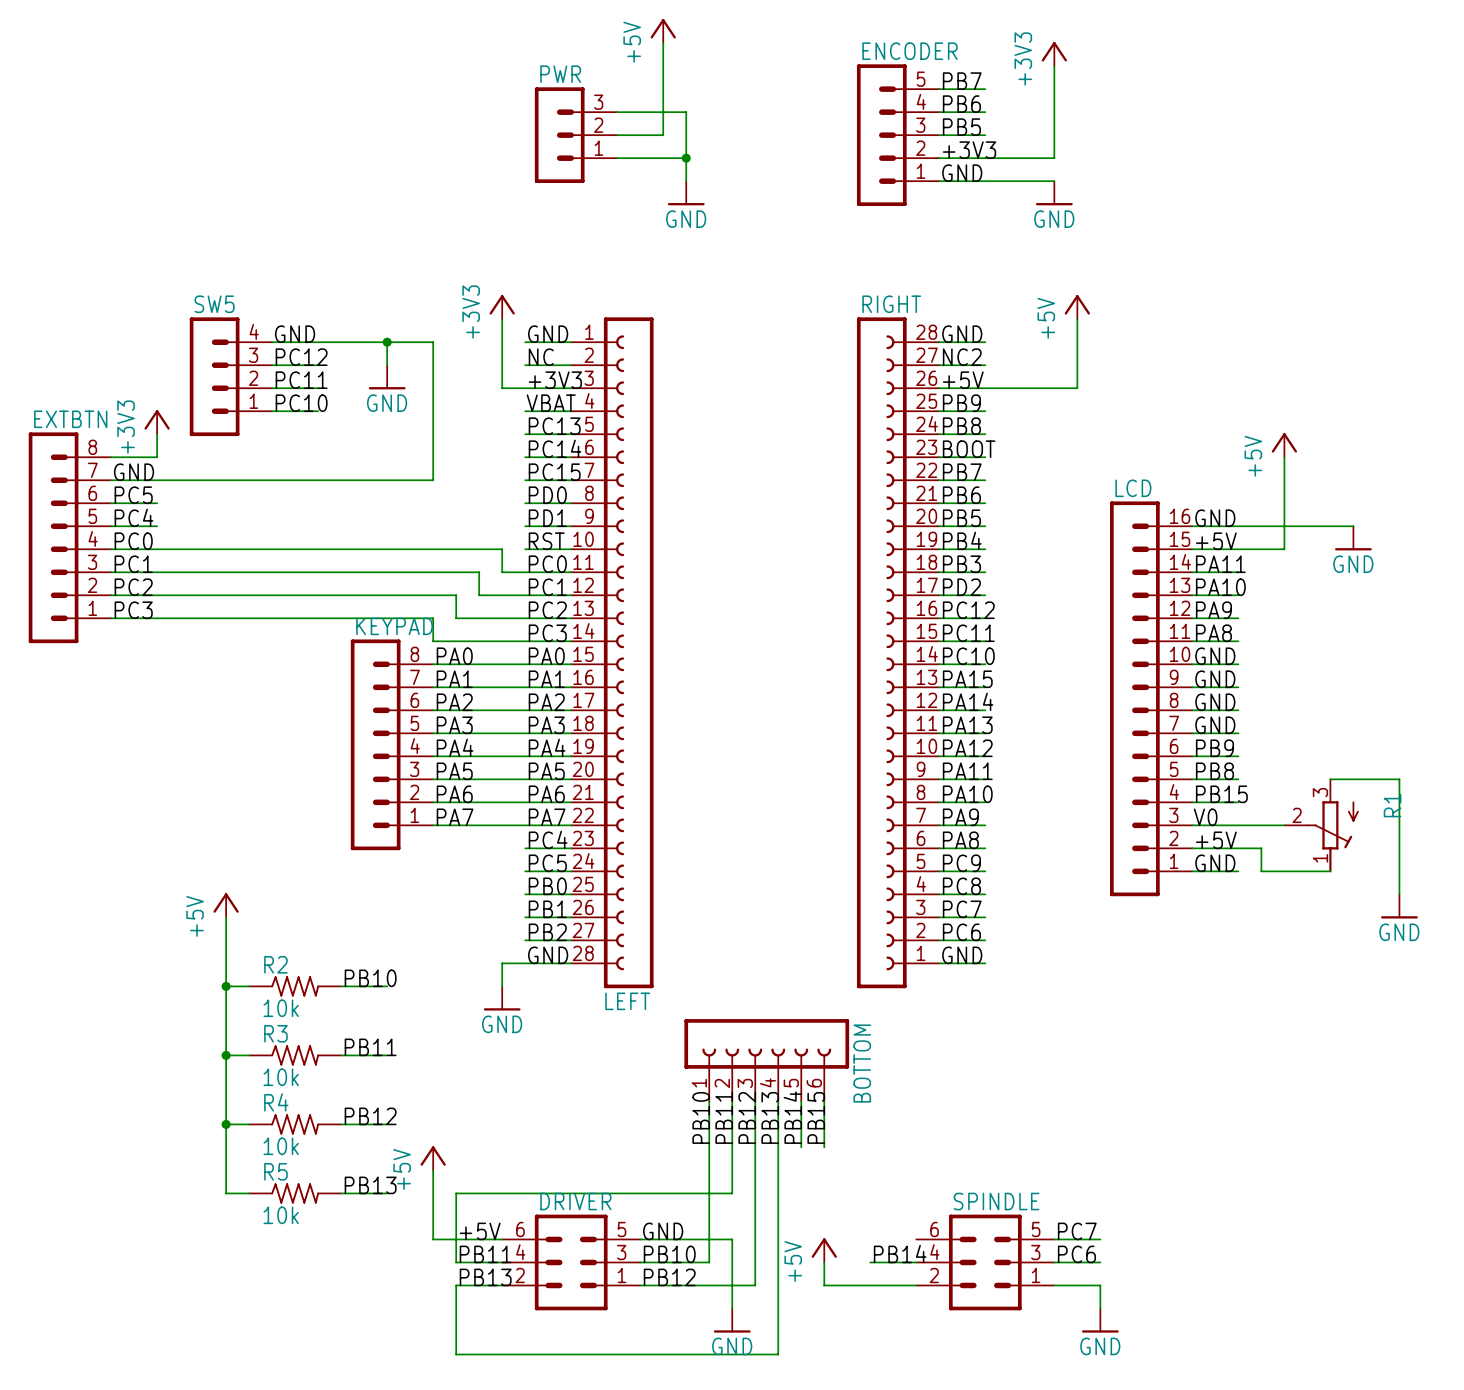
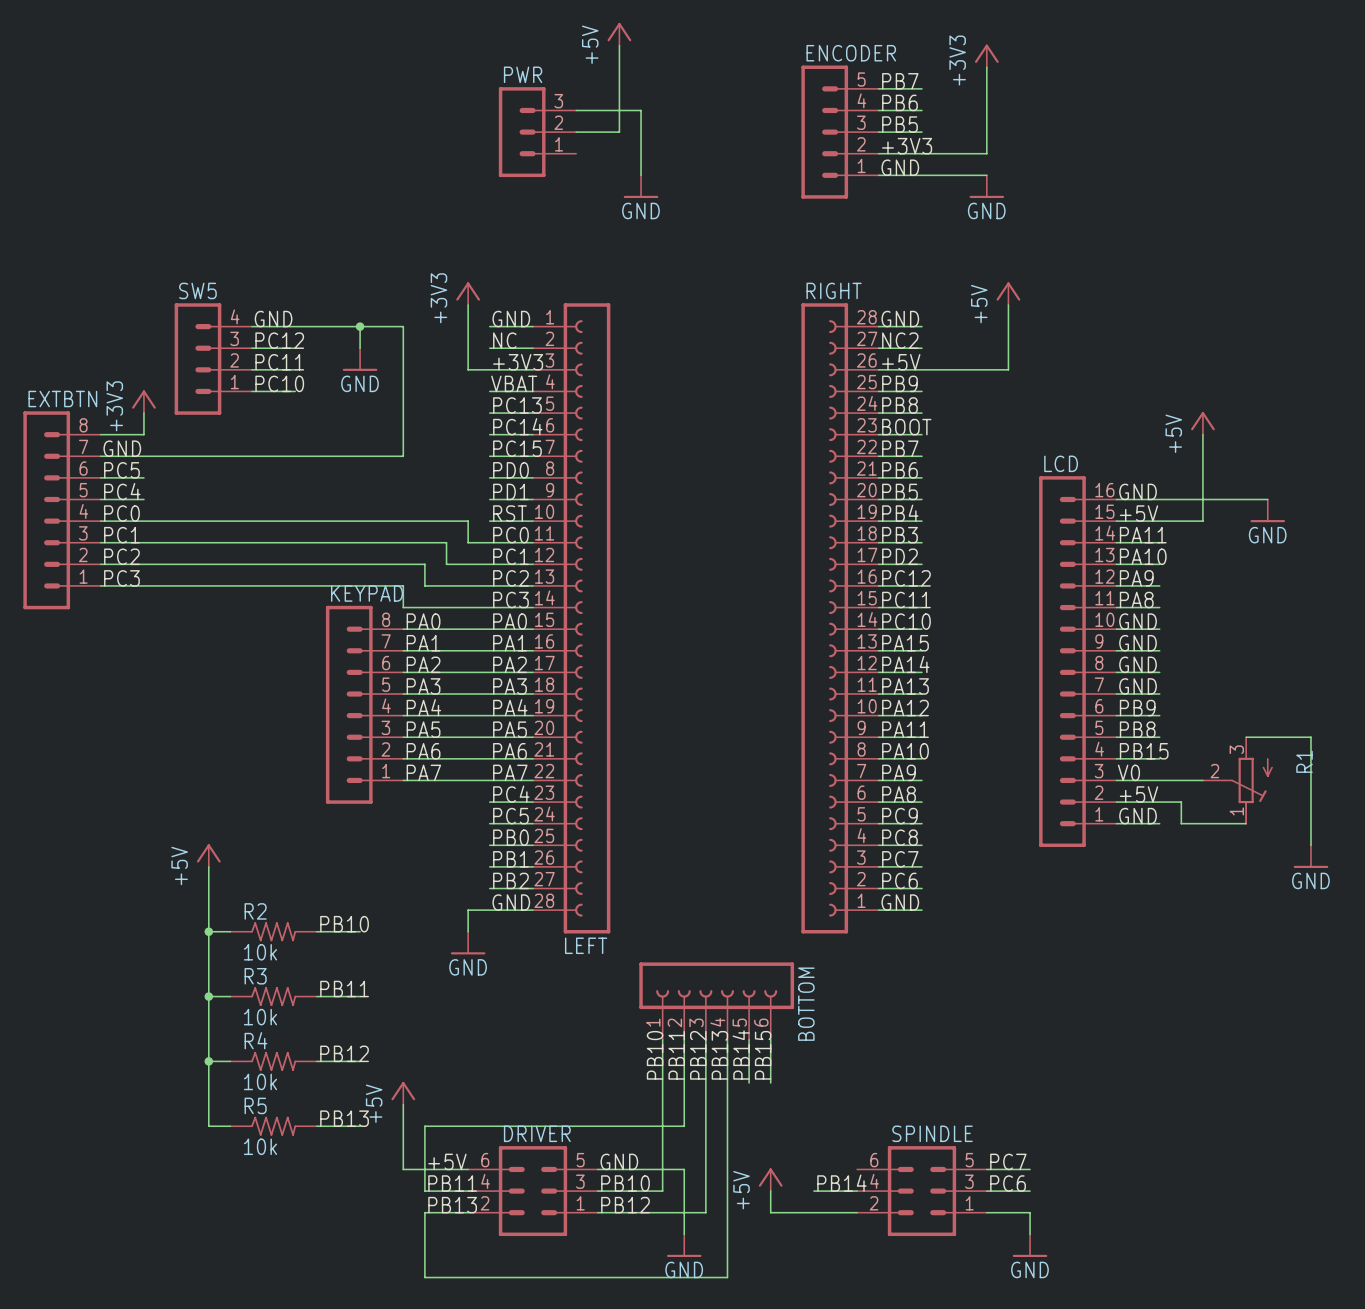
wire: (617, 158) (686, 158) -> none
junction: (686, 158) -> none

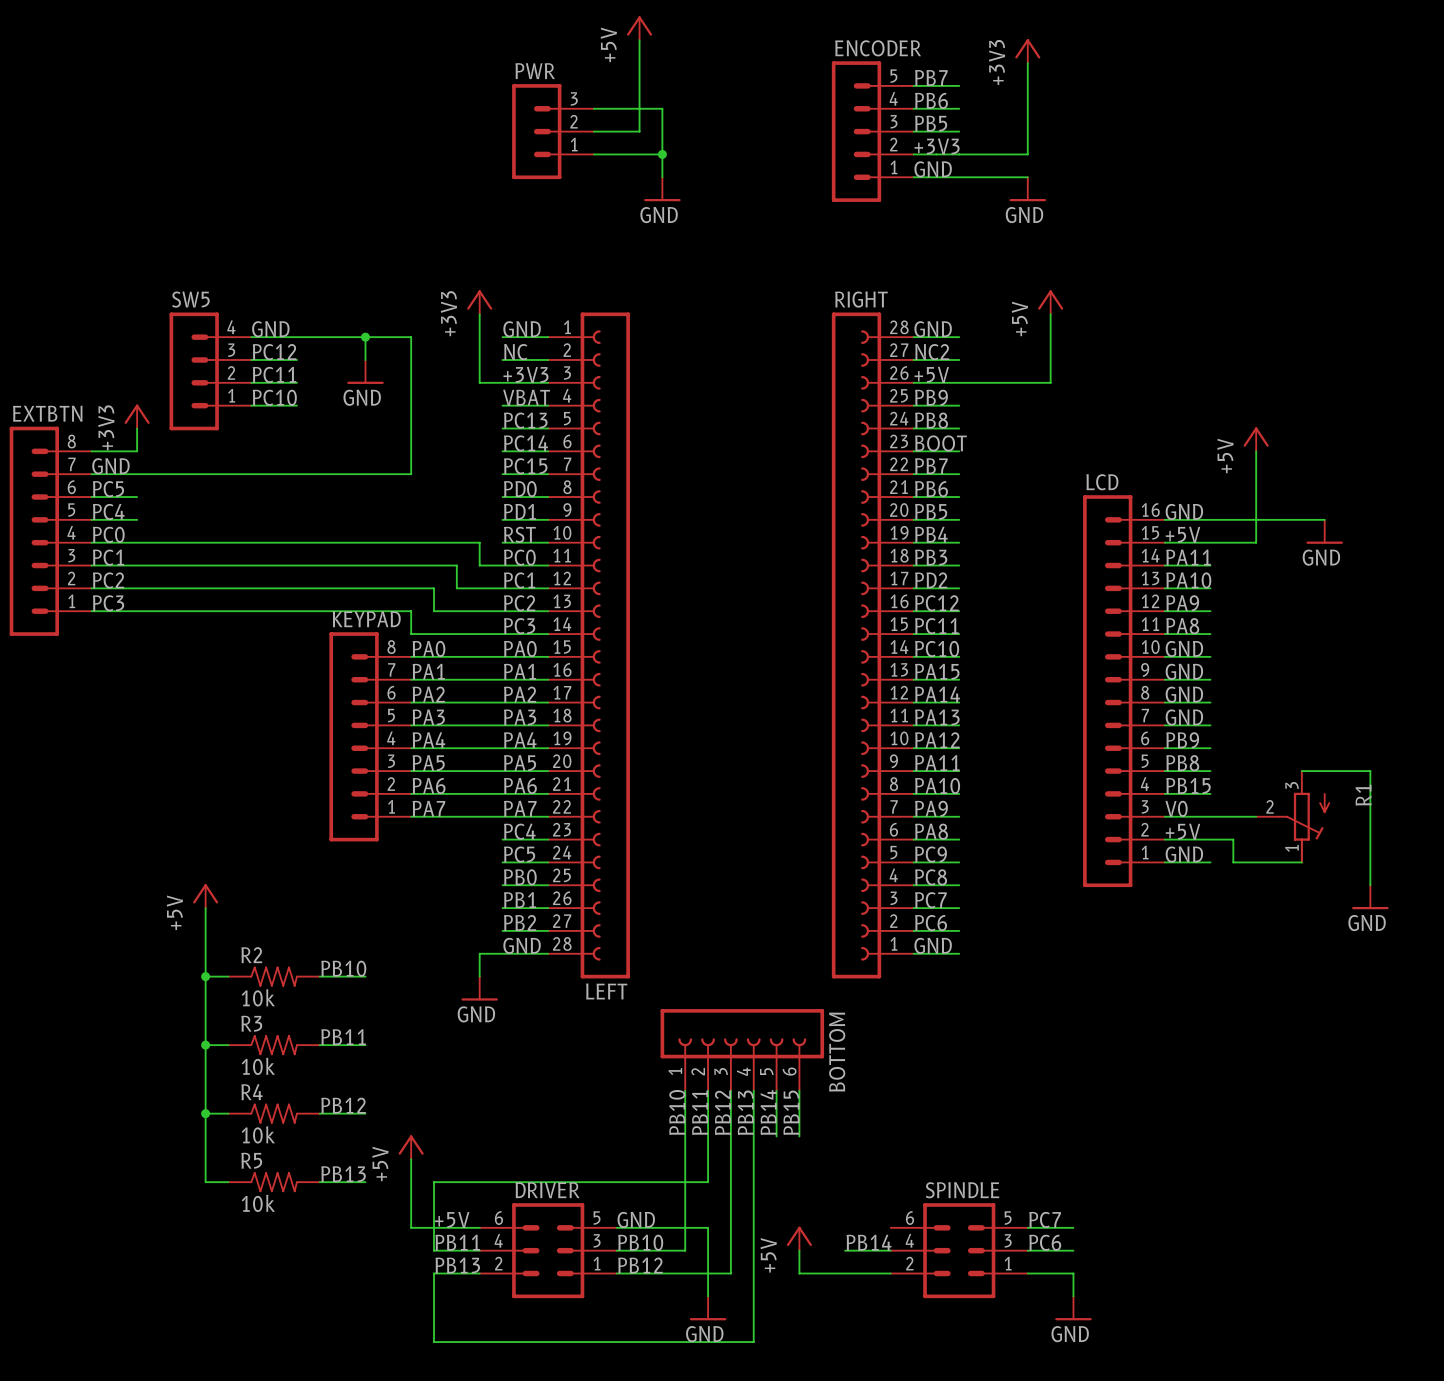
wire: none -> (593, 154) (662, 154)
junction: none -> (662, 154)

